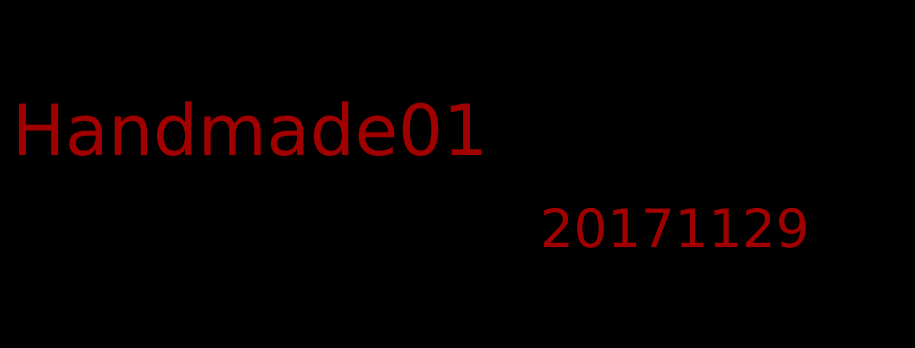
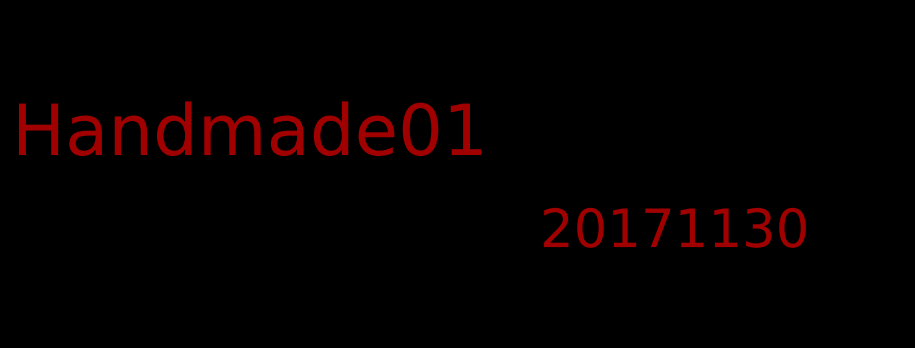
text: 20171129 (674, 227) -> 20171130 (674, 227)

